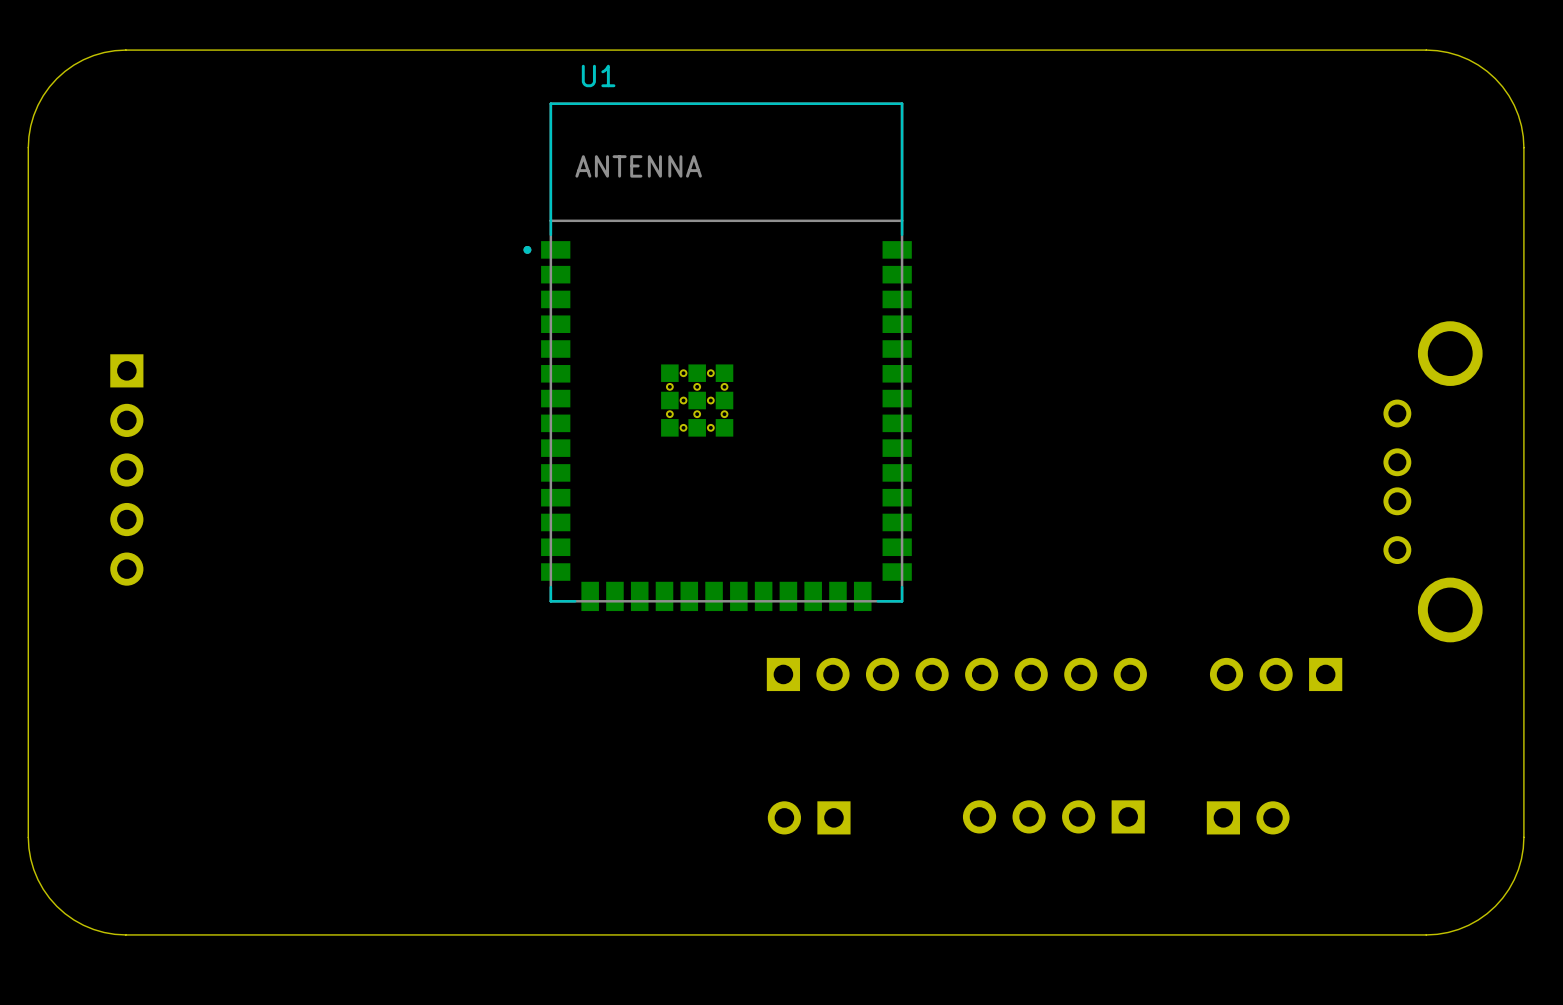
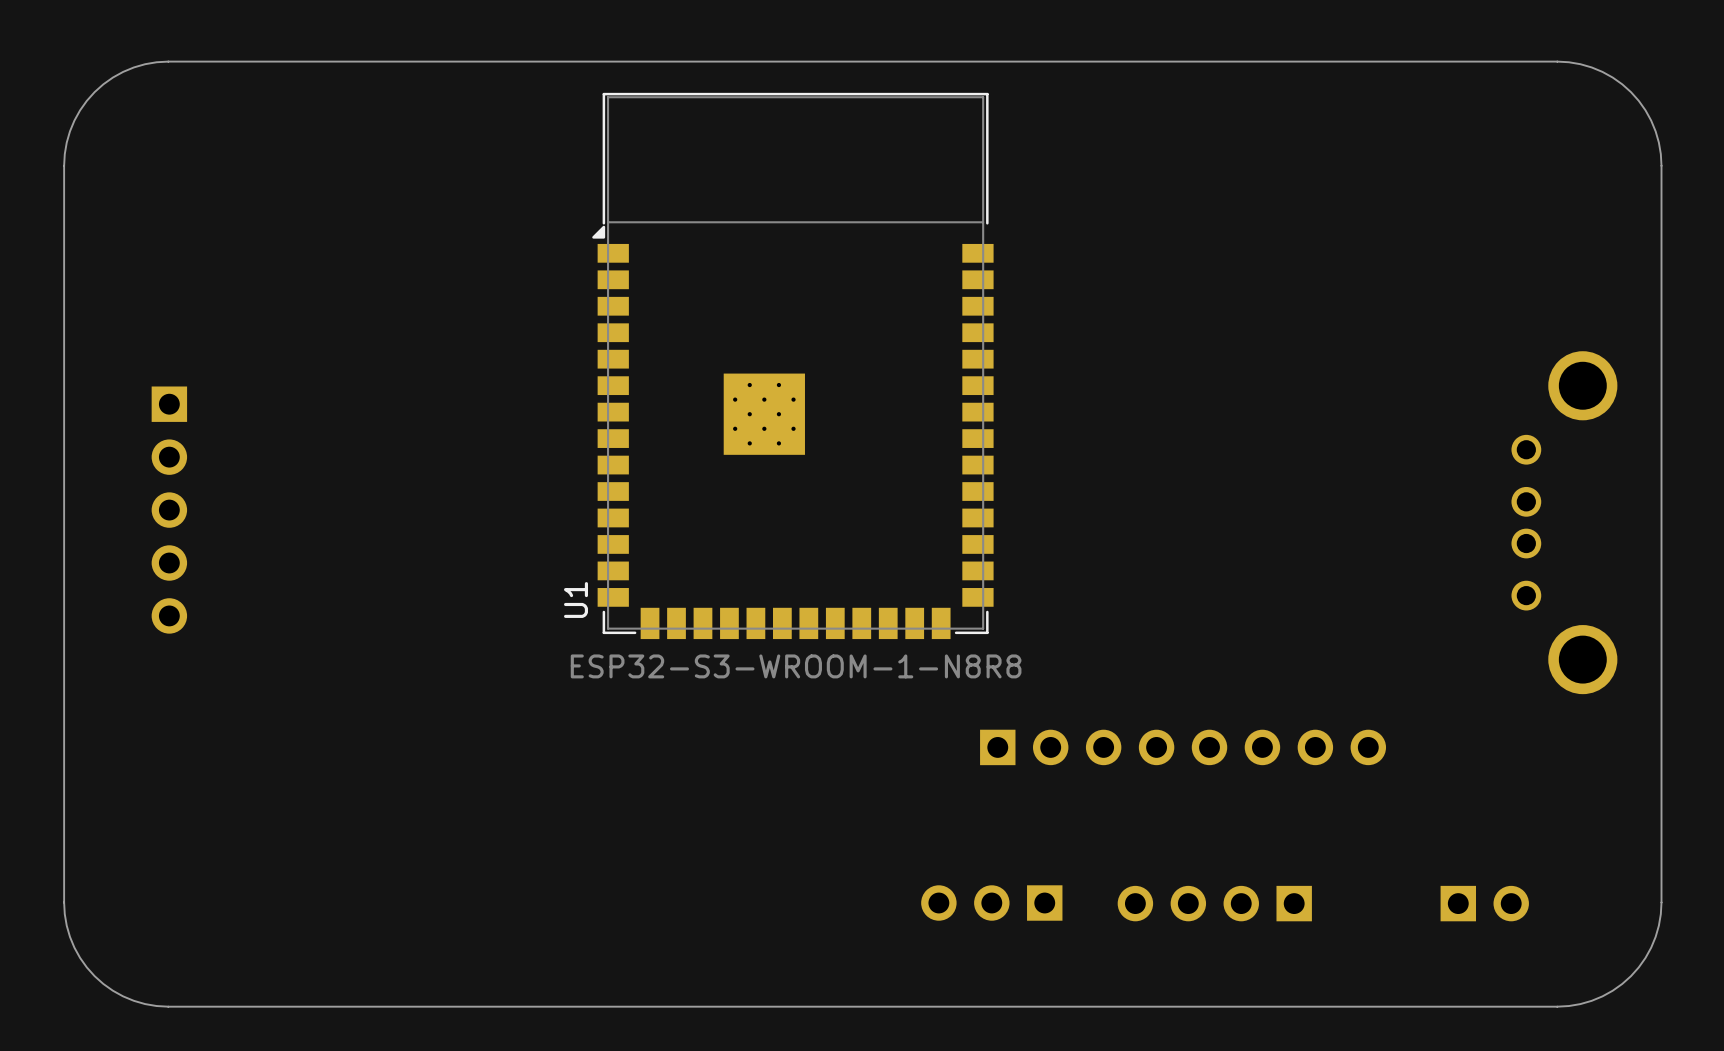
U1 name position: U1 (598, 75) -> U1 (576, 600)
U1 footprint: [523, 102, 912, 612] -> [592, 92, 994, 640]
U1 value: none -> ESP32-S3-WROOM-1-N8R8 (796, 666)
part position: (956, 674) -> (1183, 747)
part position: (1276, 674) -> (991, 903)
part position: (1053, 816) -> (1214, 903)
part: (809, 817) -> none
part position: (1248, 817) -> (1484, 903)

